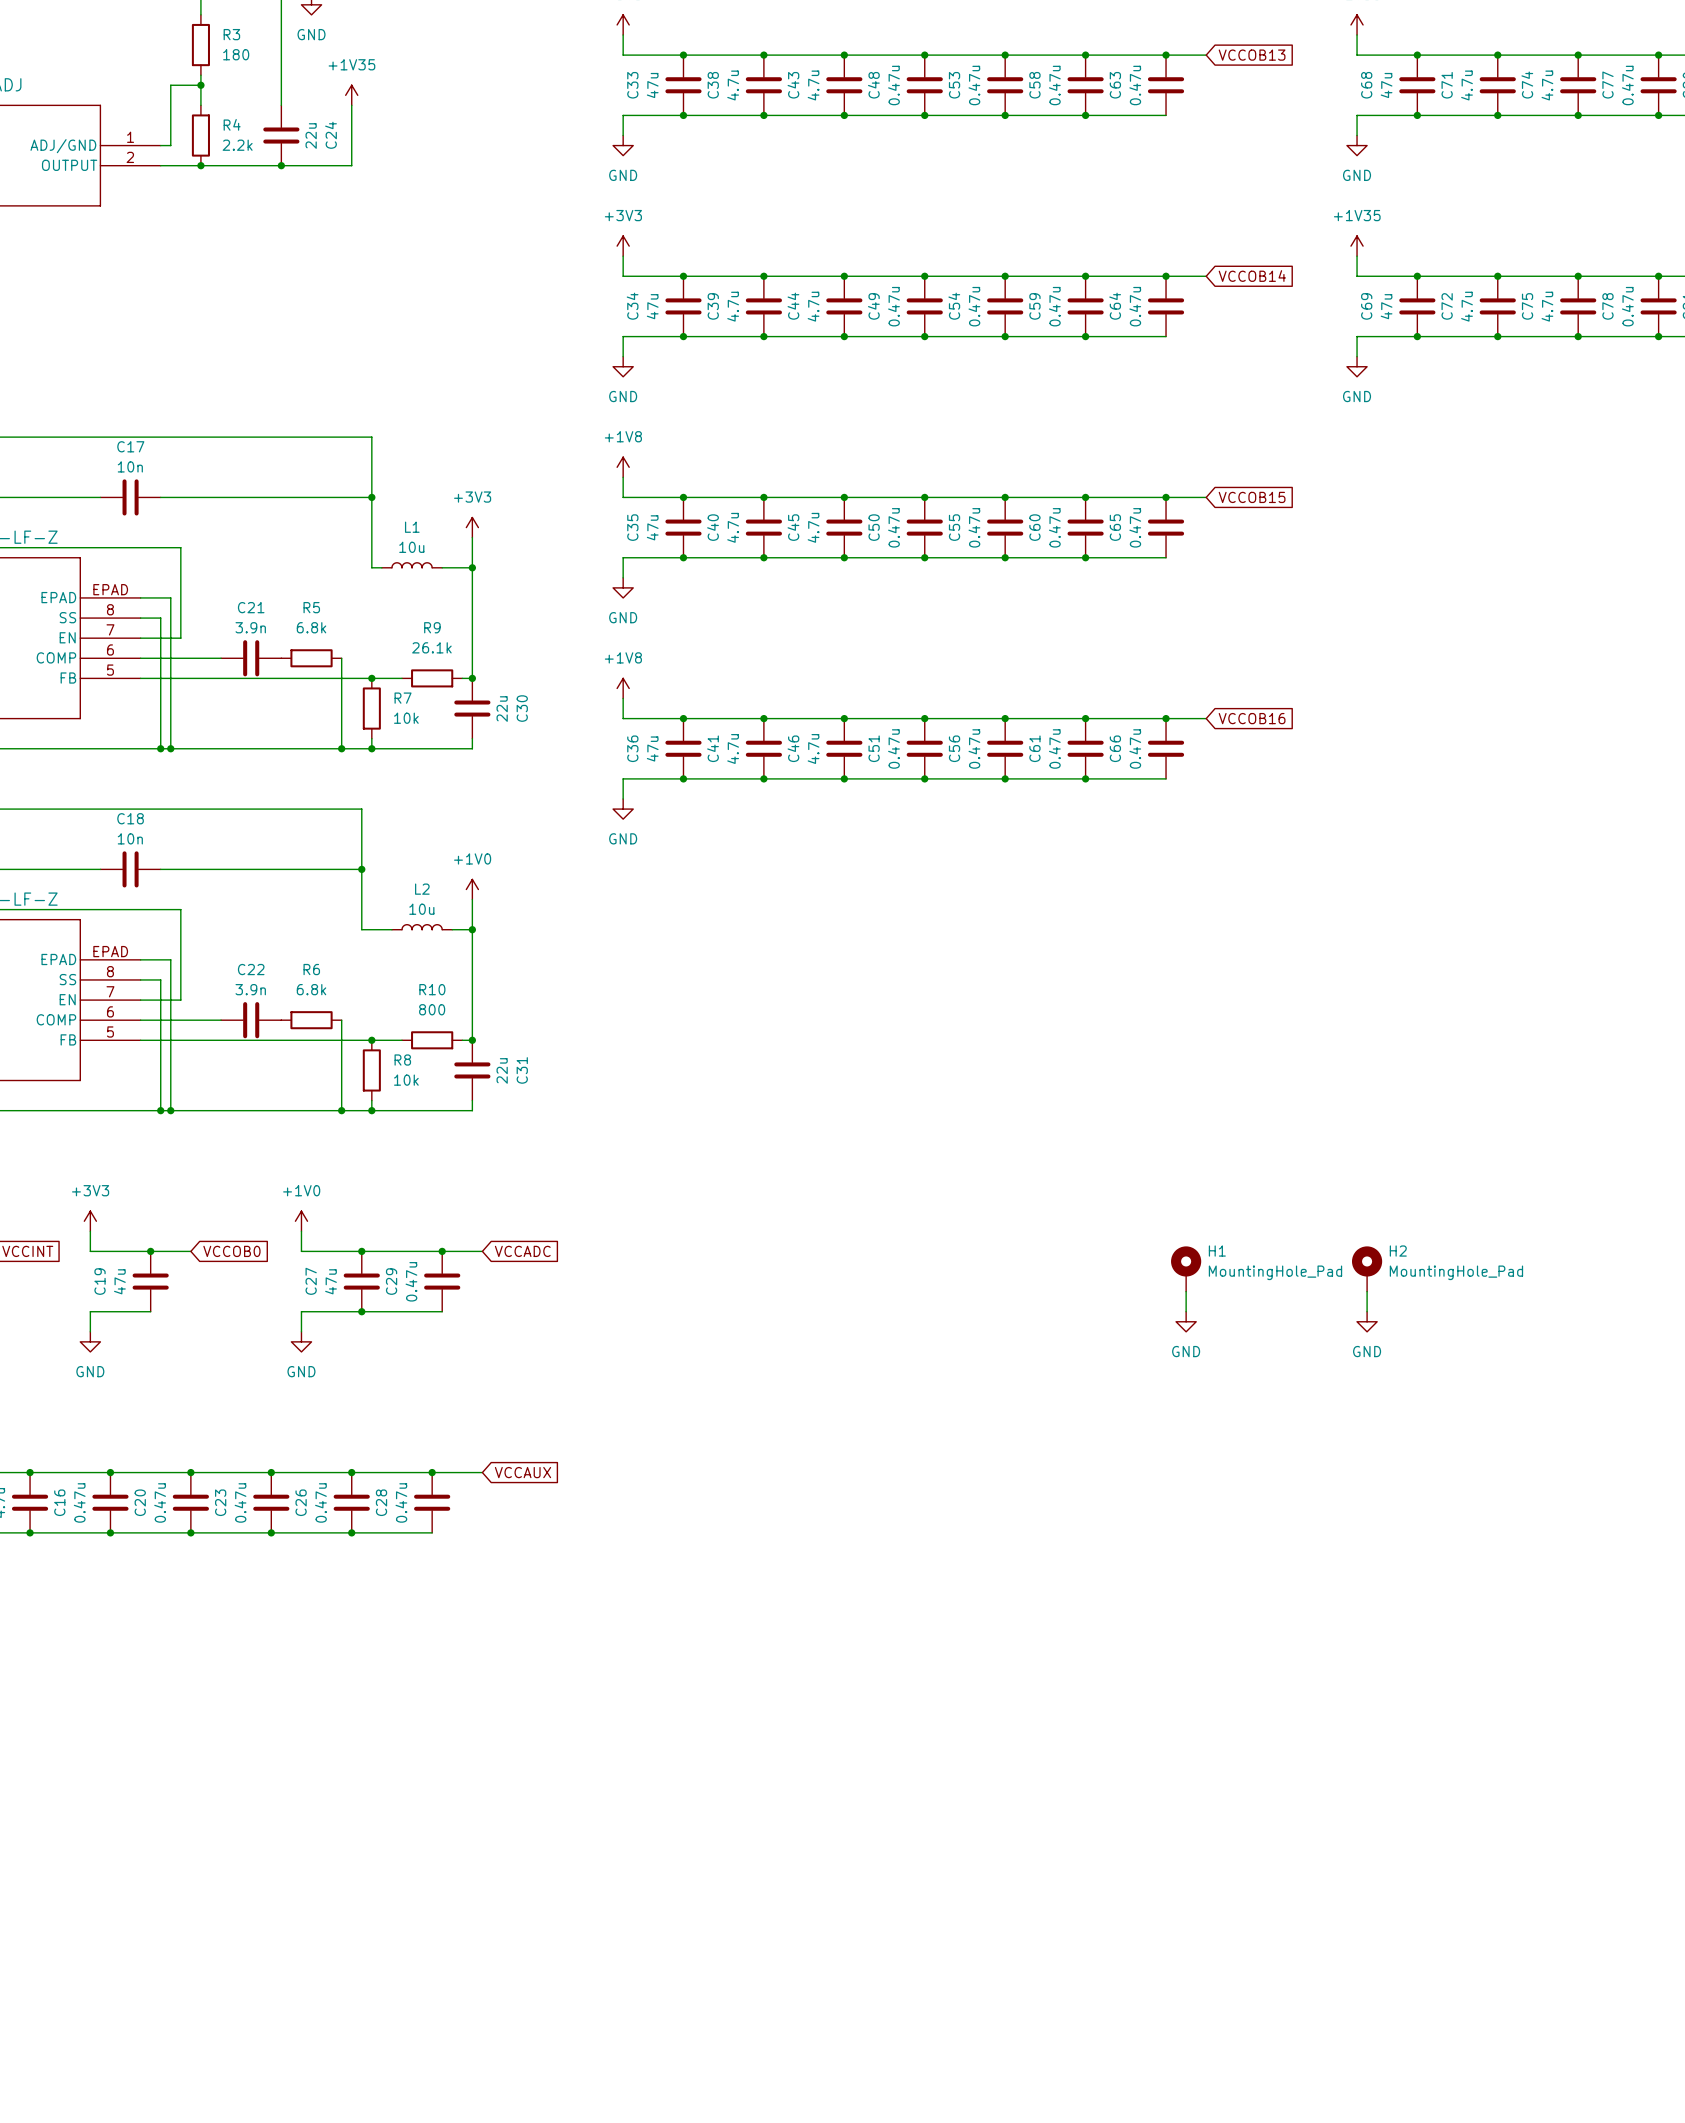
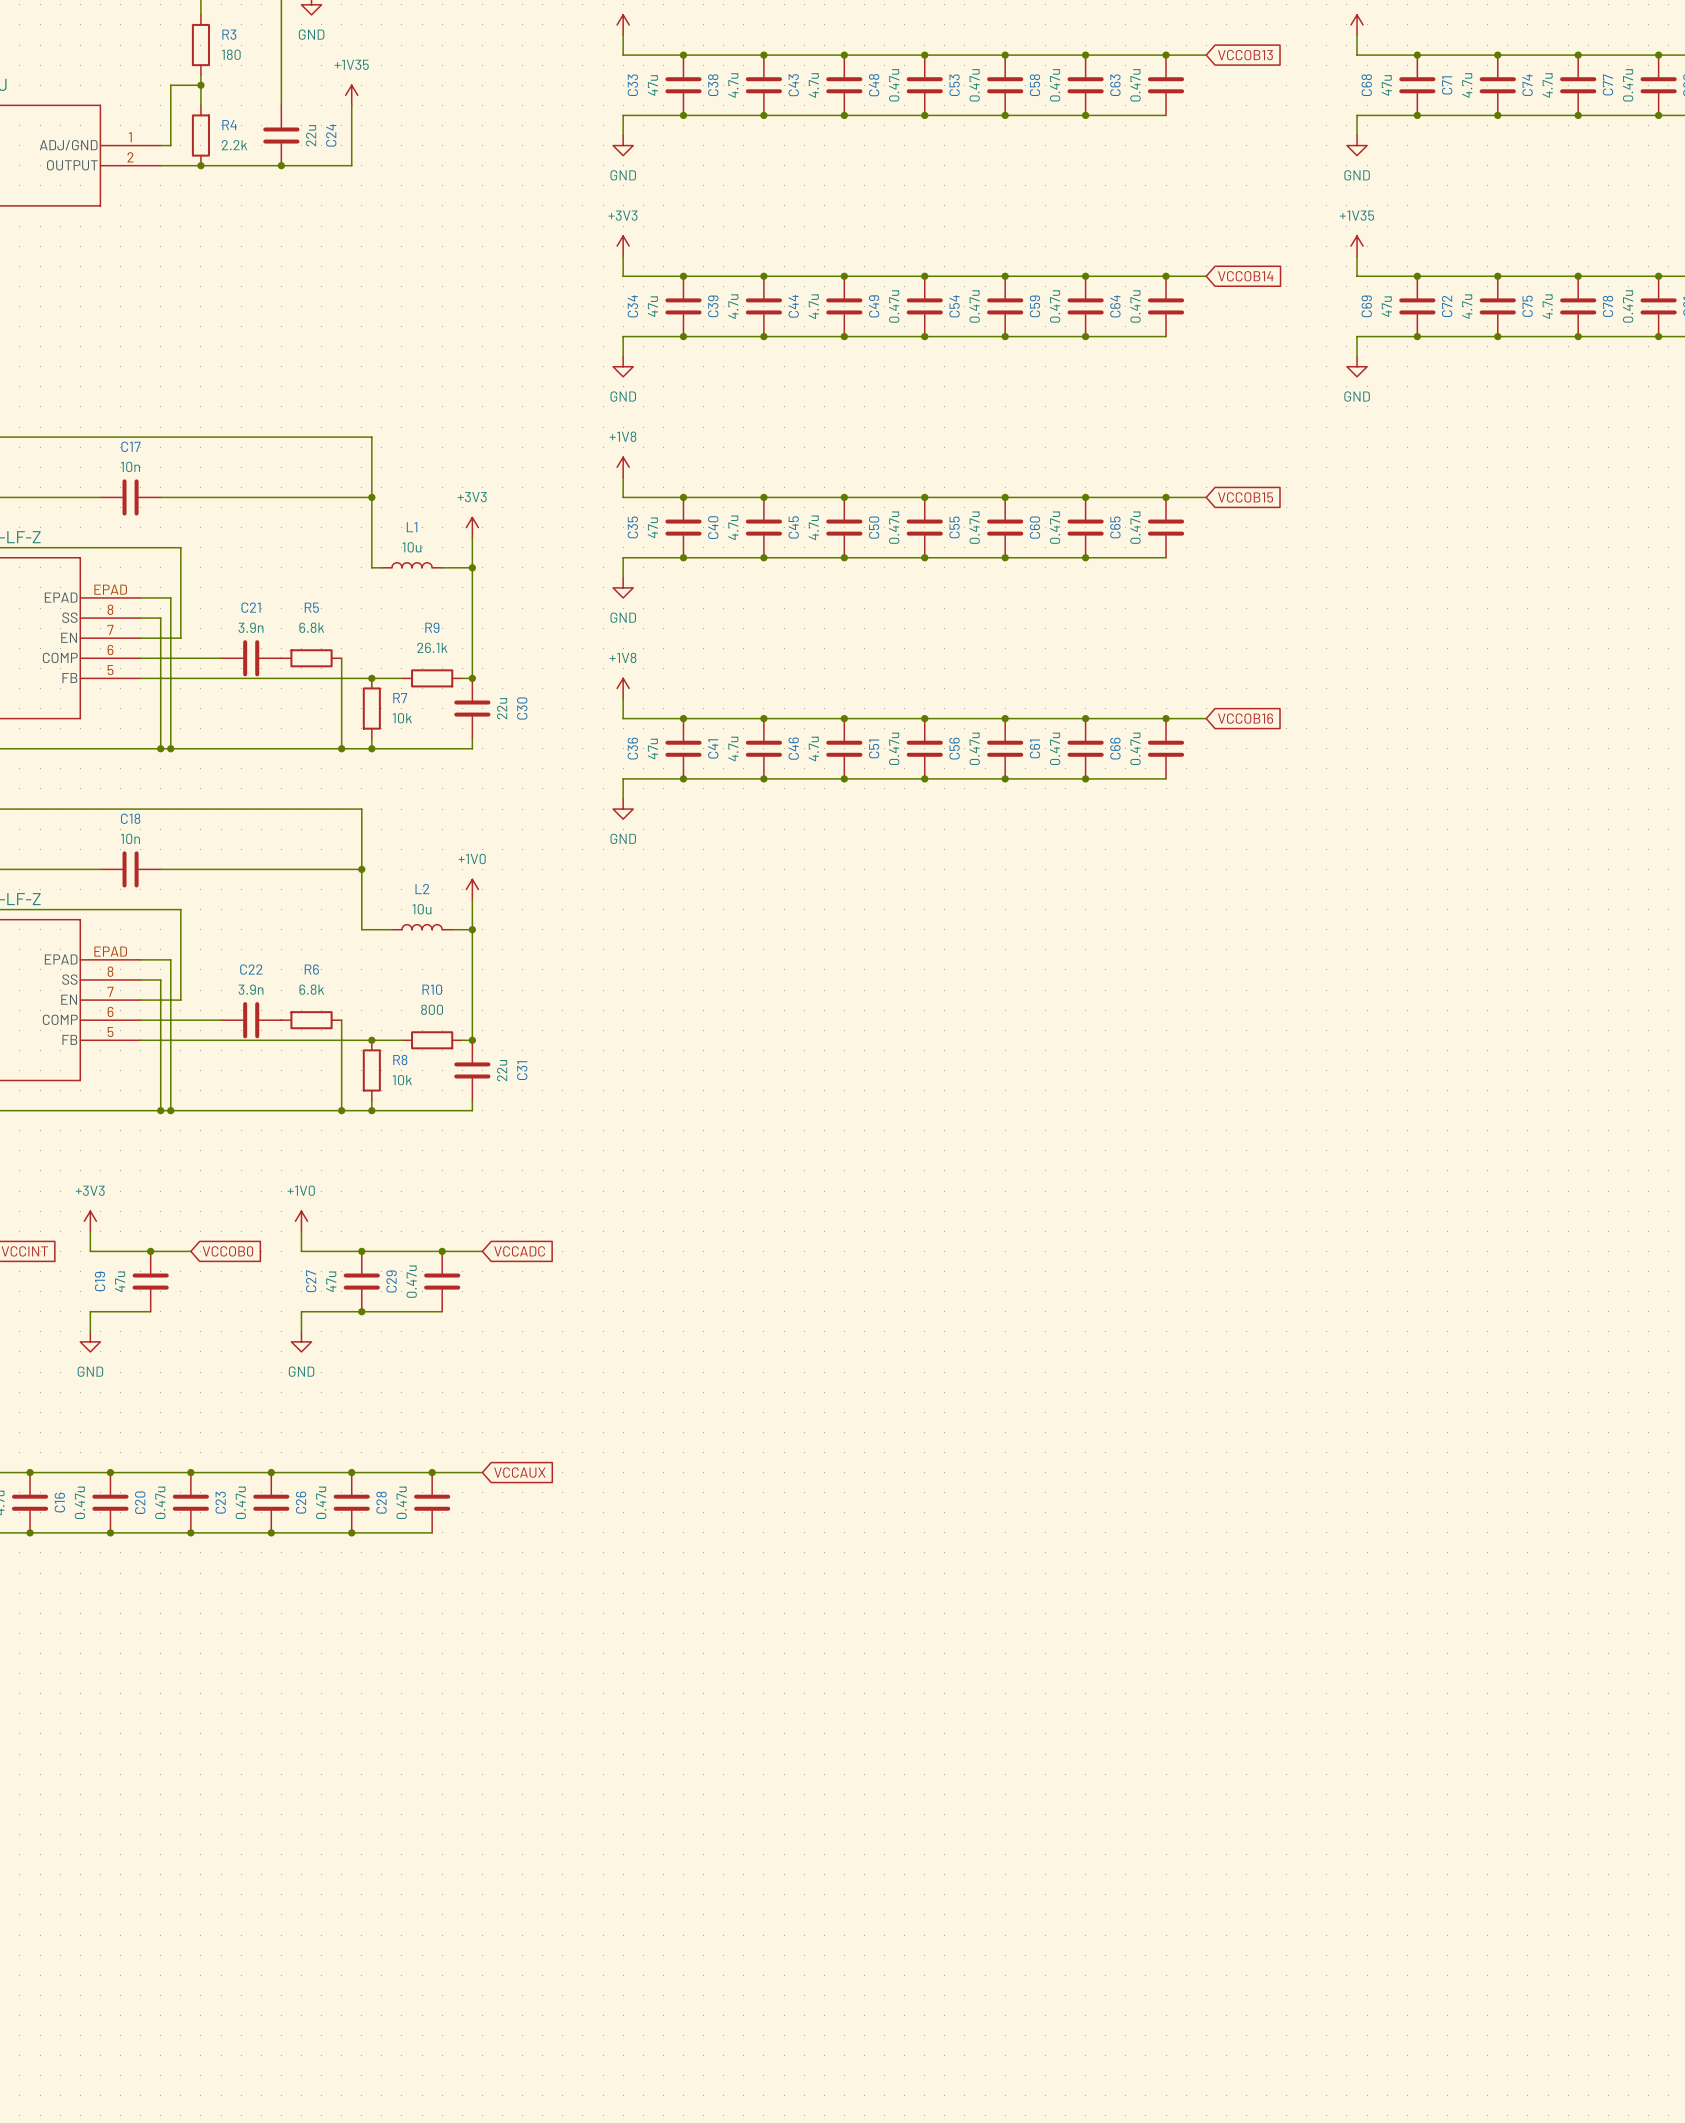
H1: MountingHole_Pad (1186, 1269) -> none
H2: MountingHole_Pad (1367, 1269) -> none
wire: (1186, 1291) (1186, 1311) -> none
wire: (1367, 1291) (1367, 1311) -> none
power symbol: GND (1186, 1321) -> none
power symbol: GND (1367, 1321) -> none

